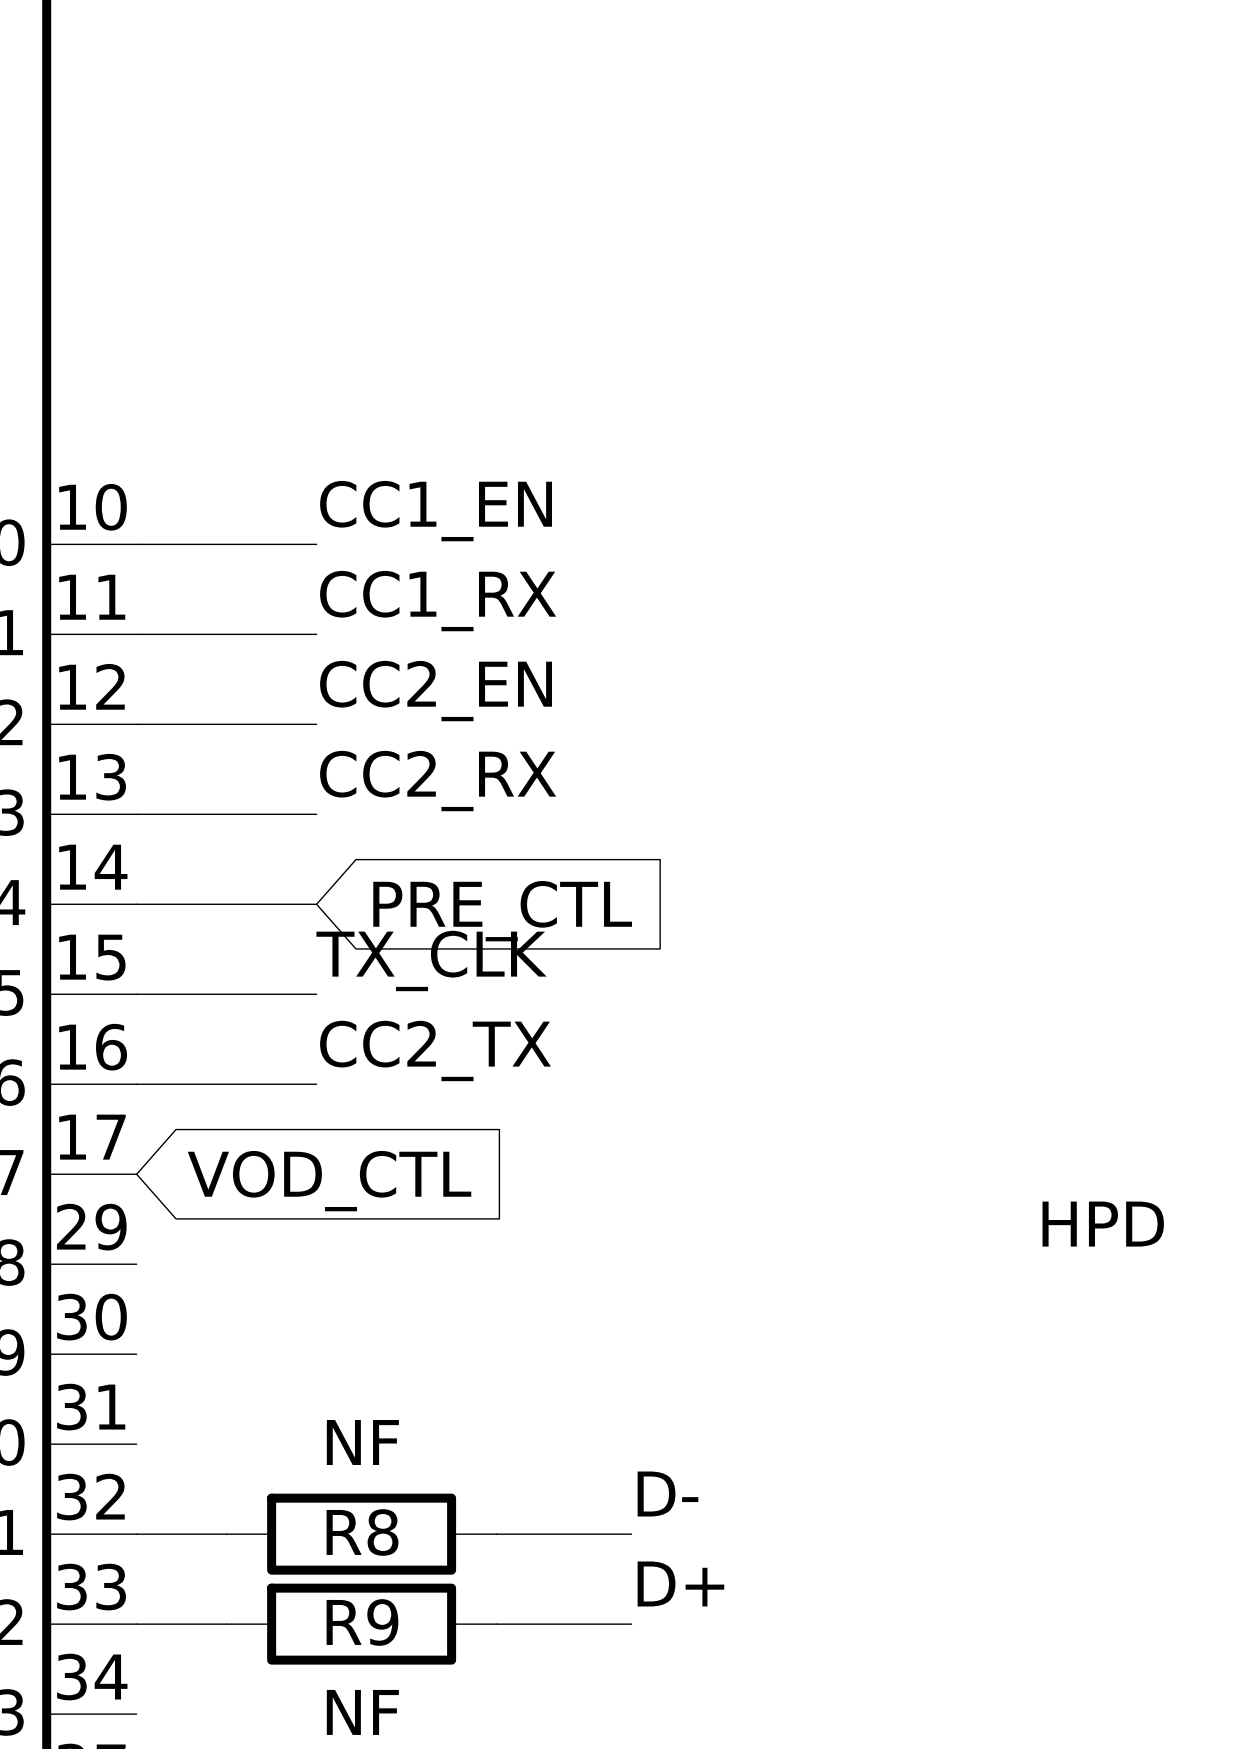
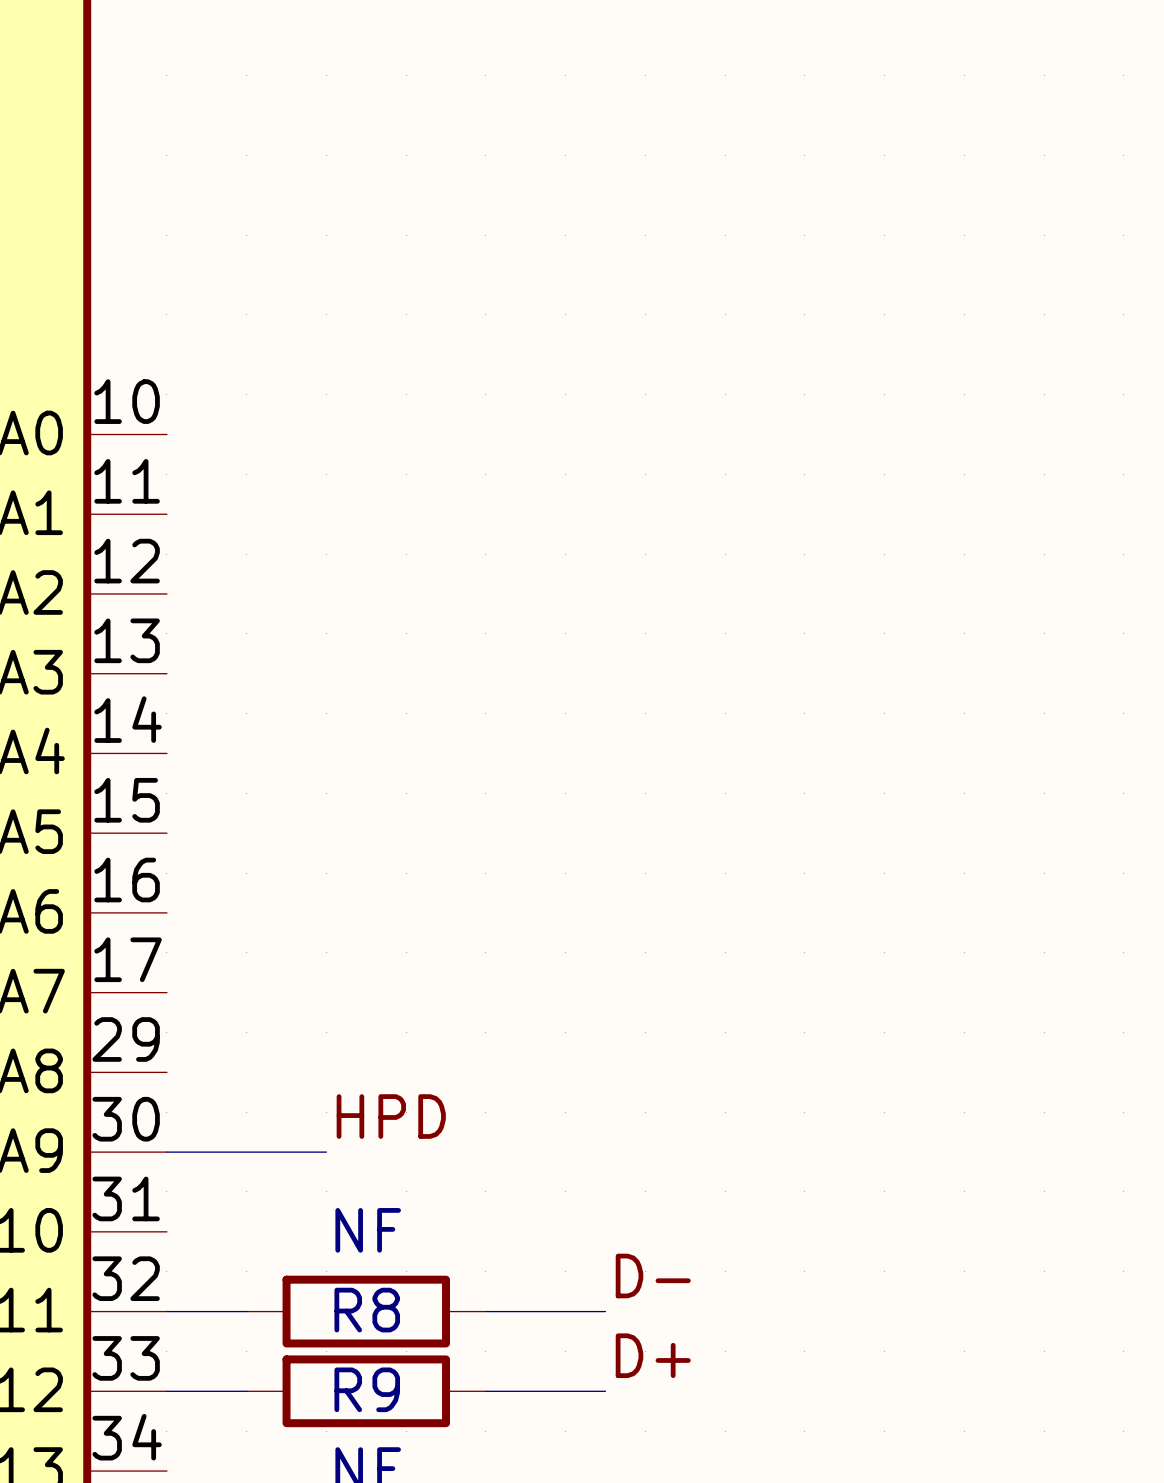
label: CC1_EN (436, 511) -> none
wire: (136, 544) (316, 544) -> none
label: CC1_RX (438, 601) -> none
wire: (136, 634) (316, 634) -> none
label: CC2_EN (436, 691) -> none
wire: (136, 724) (316, 724) -> none
label: CC2_RX (438, 781) -> none
wire: (136, 814) (316, 814) -> none
wire: (136, 904) (316, 904) -> none
global label: PRE_CTL (502, 911) -> none
label: TX_CLK (431, 961) -> none
wire: (136, 994) (316, 994) -> none
label: CC2_TX (435, 1050) -> none
wire: (136, 1084) (316, 1084) -> (166, 1152) (326, 1152)
global label: VOD_CTL (329, 1181) -> none
label position: HPD (1103, 1224) -> HPD (391, 1116)

